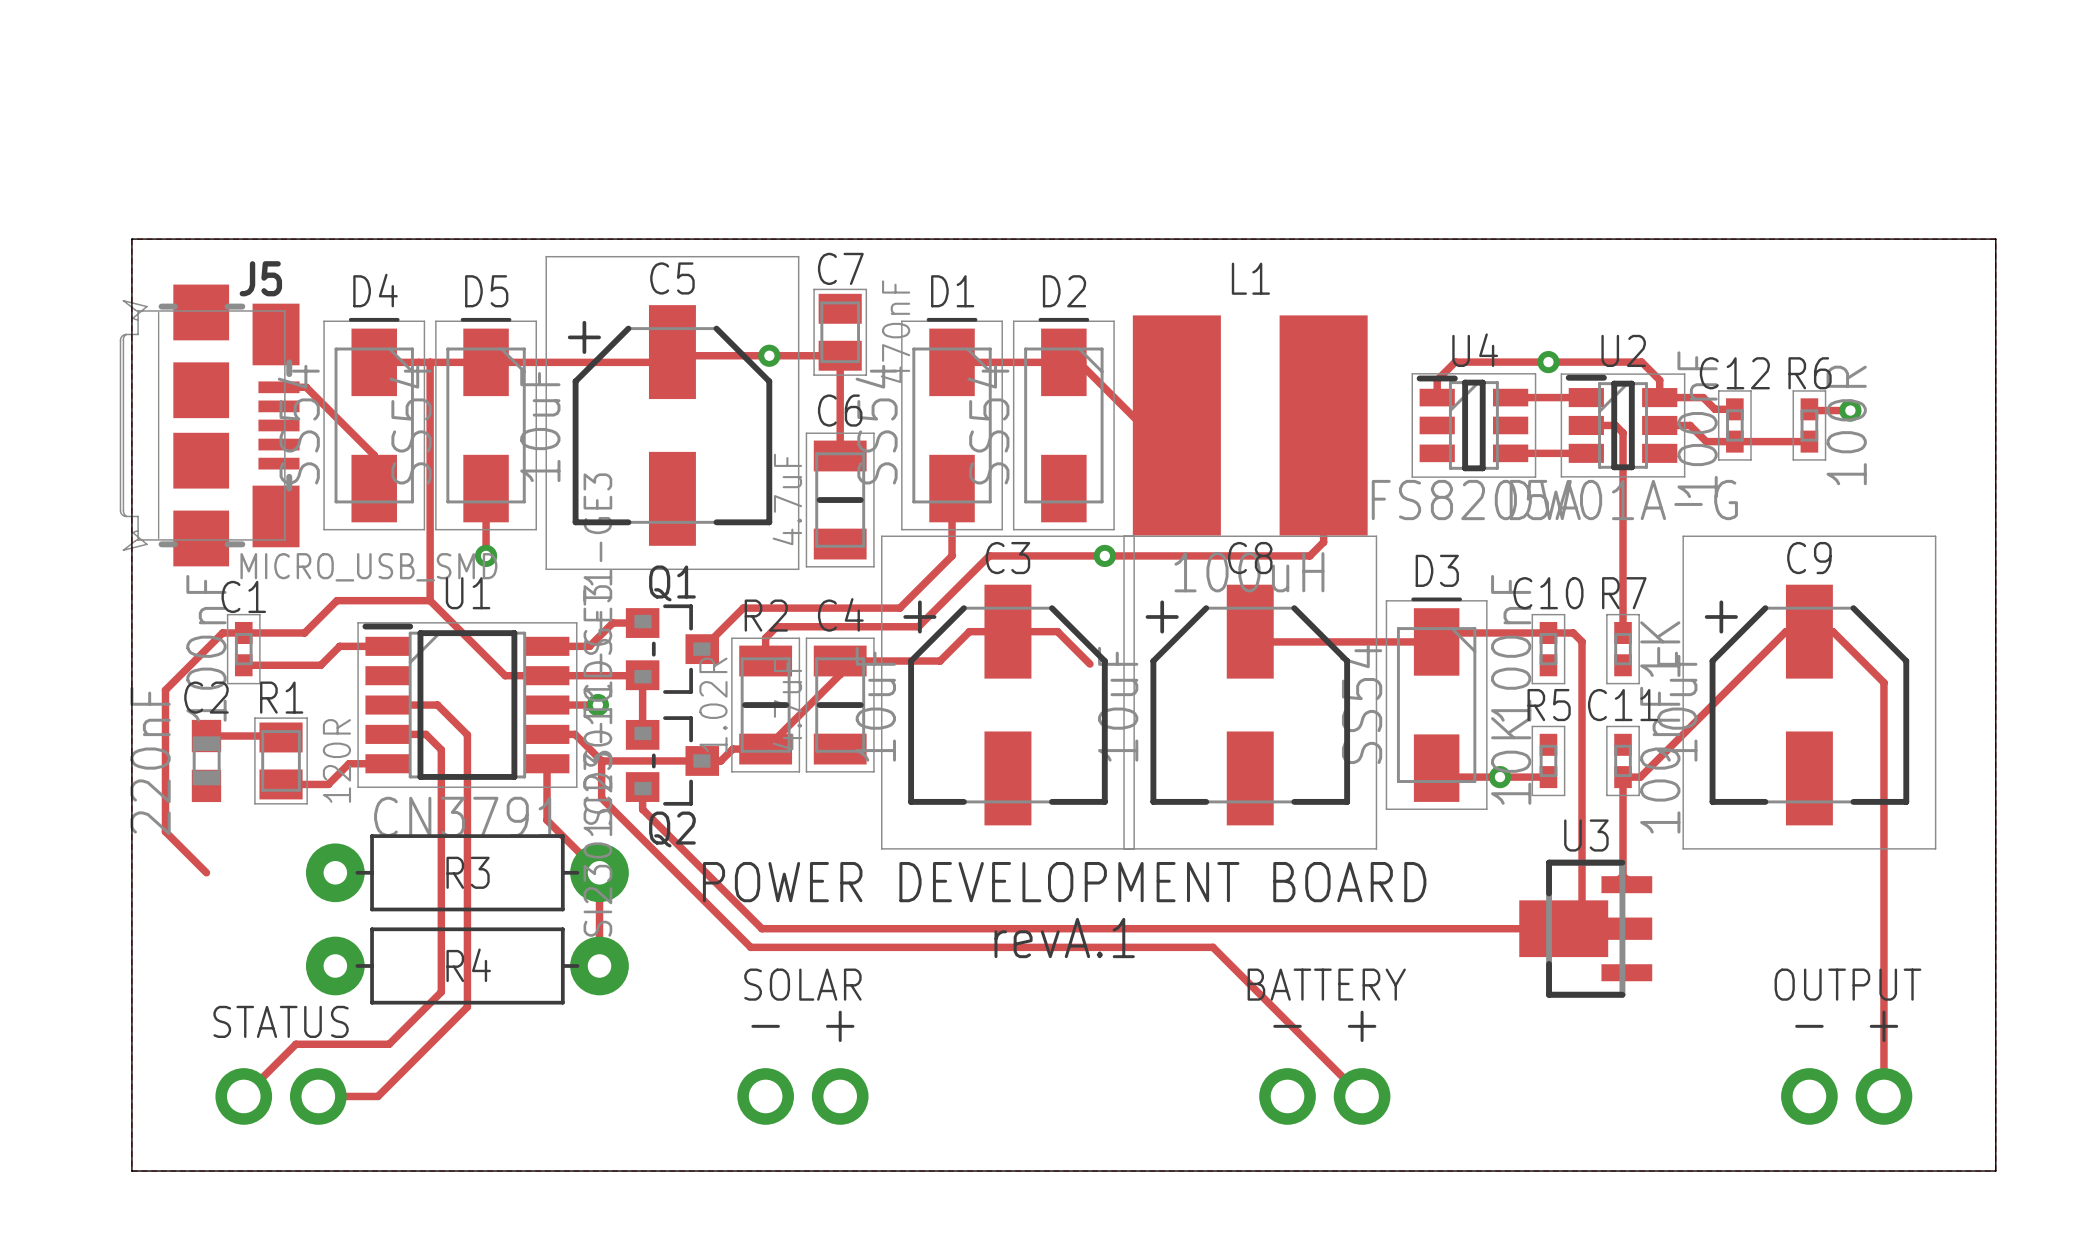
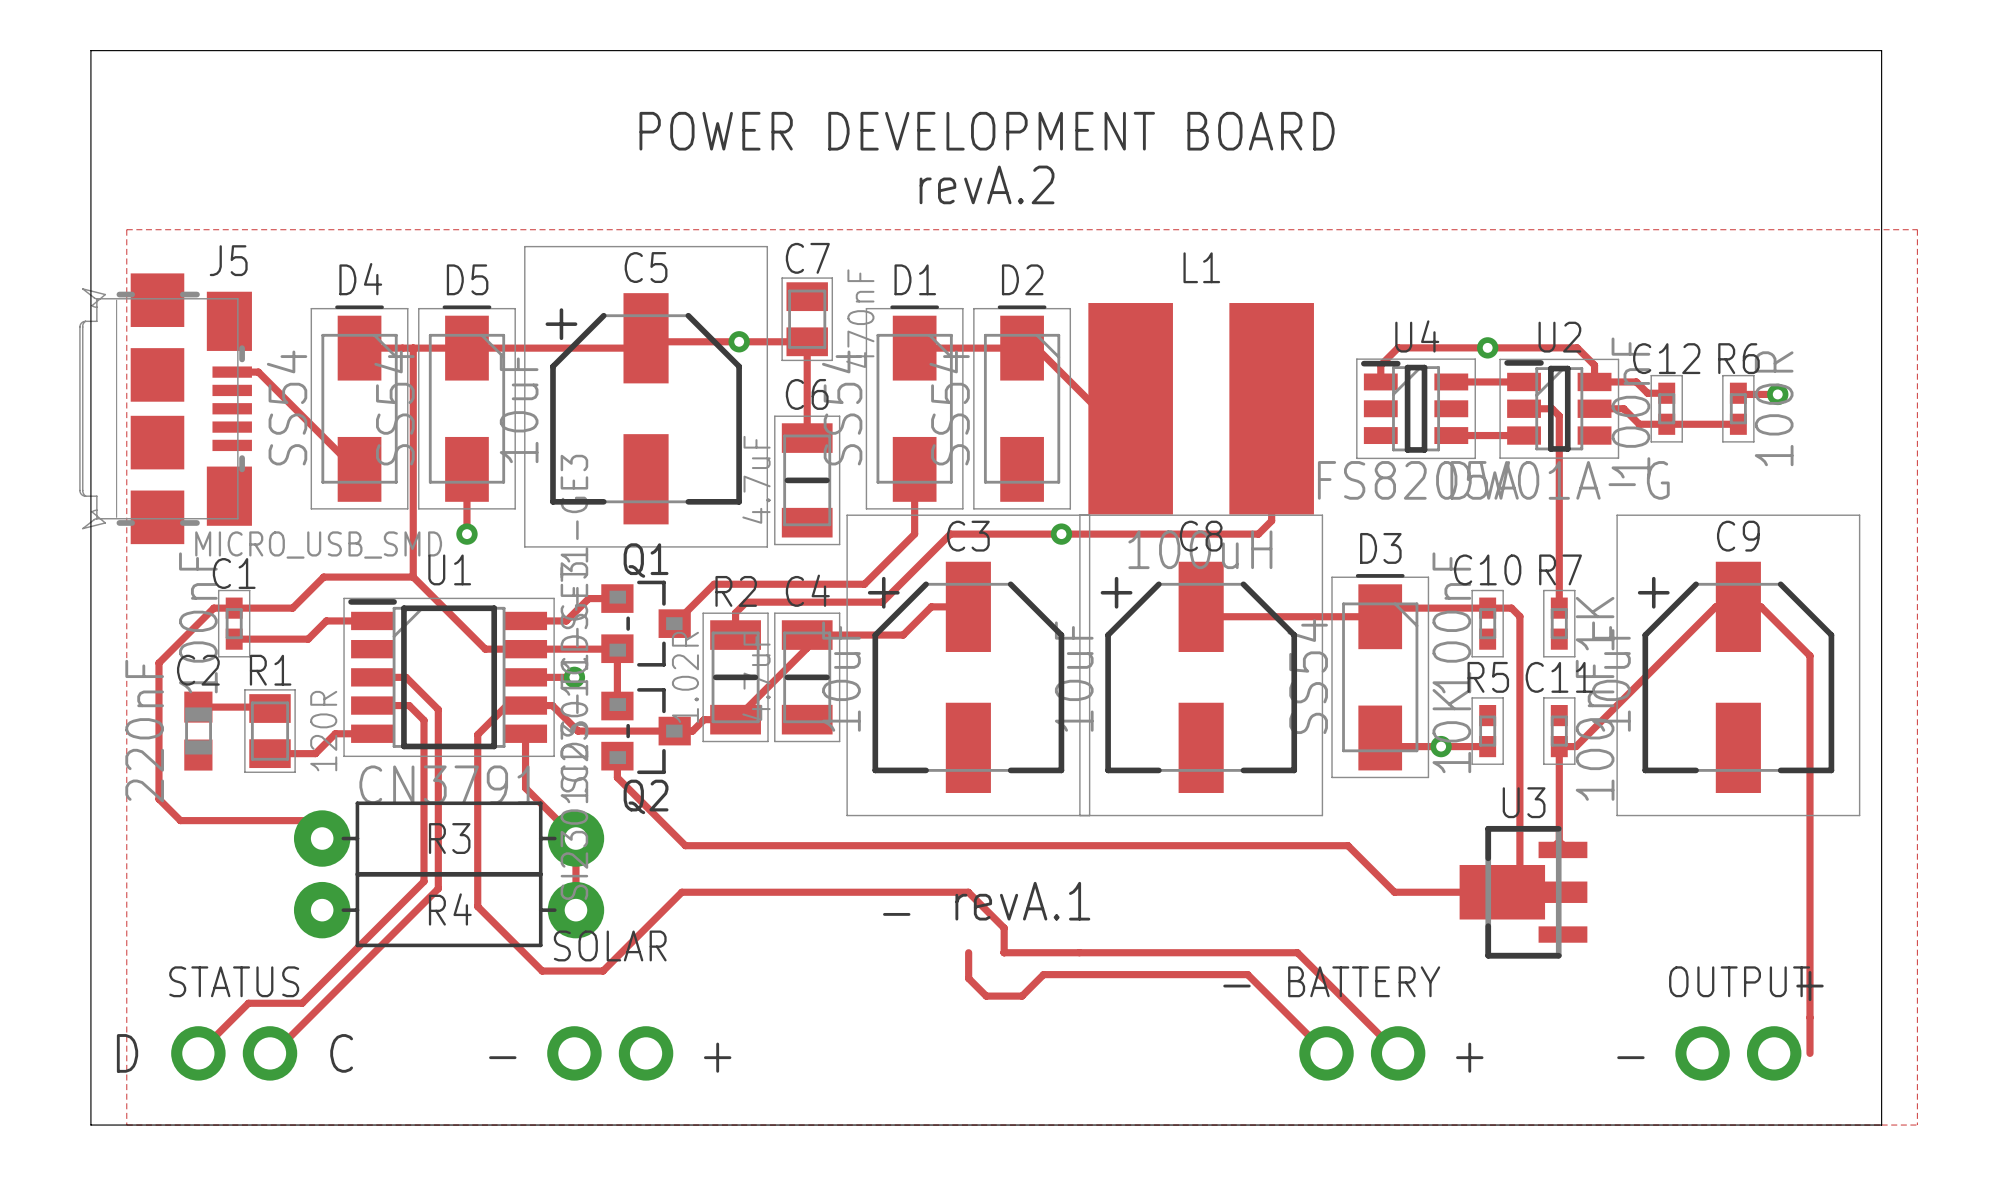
text: none -> POWER DEVELOPMENT BOARD (987, 131)
text: none -> revA.2 (987, 184)
J5 name position: J5 (260, 278) -> J5 (228, 260)
track: (278, 387) (306, 387) (374, 455) (374, 488) -> (232, 372) (258, 372) (355, 469) (359, 469)
J5 position: (209, 425) -> (165, 408)
track: (1007, 631) (1057, 631) (1089, 664) -> none
track: (422, 705) (437, 705) (467, 734) (467, 1006) (377, 1096) (318, 1096) -> (406, 677) (438, 709) (438, 888) (273, 1053) (270, 1053)
track: (601, 760) (601, 798) (750, 947) (1212, 947) (1362, 1096) -> none
track: (187, 854) (206, 872) -> (180, 820) (322, 820)
track: (713, 880) (761, 928) -> (525, 705) (506, 705) (477, 734) (477, 906) (542, 971) (603, 971) (681, 892) (732, 892)
track: none -> (685, 845) (1347, 845) (1394, 892)
text: POWER DEVELOPMENT BOARD (1064, 882) -> none
track: (441, 917) (441, 992) (389, 1044) (314, 1044) -> (424, 881) (302, 1003)
track: (1007, 928) (1451, 928) -> (968, 892) (1004, 928) (1004, 952) (1297, 952) (1398, 1053)
text: none -> - (896, 914)
R4 position: (467, 965) -> (449, 910)
BATTERY name position: BATTERY (1326, 984) -> BATTERY (1364, 981)
OUTPUT name position: OUTPUT (1847, 984) -> OUTPUT (1739, 981)
track: none -> (968, 952) (968, 978) (986, 996) (1022, 996) (1043, 974) (1247, 974) (1326, 1053)
text: - (765, 1026) -> none
text position: + (840, 1026) -> + (717, 1057)
text position: + (1362, 1026) -> + (1469, 1057)
text position: - (1809, 1026) -> - (1630, 1057)
track: (295, 1044) (243, 1096) -> (284, 1003) (248, 1003) (198, 1053)
text: none -> D (127, 1053)
STATUS position: (281, 1096) -> (234, 1053)
text: none -> C (341, 1053)
SOLAR position: (802, 1096) -> (610, 1053)
BATTERY position: (1324, 1096) -> (1362, 1053)
OUTPUT position: (1846, 1096) -> (1738, 1053)
text: none -> - (502, 1057)
board edge: (131, 1171) (131, 239) (1995, 239) (1995, 1171) (1958, 1171) -> (126, 1125) (90, 1125) (90, 50) (1881, 50) (1881, 1125)

